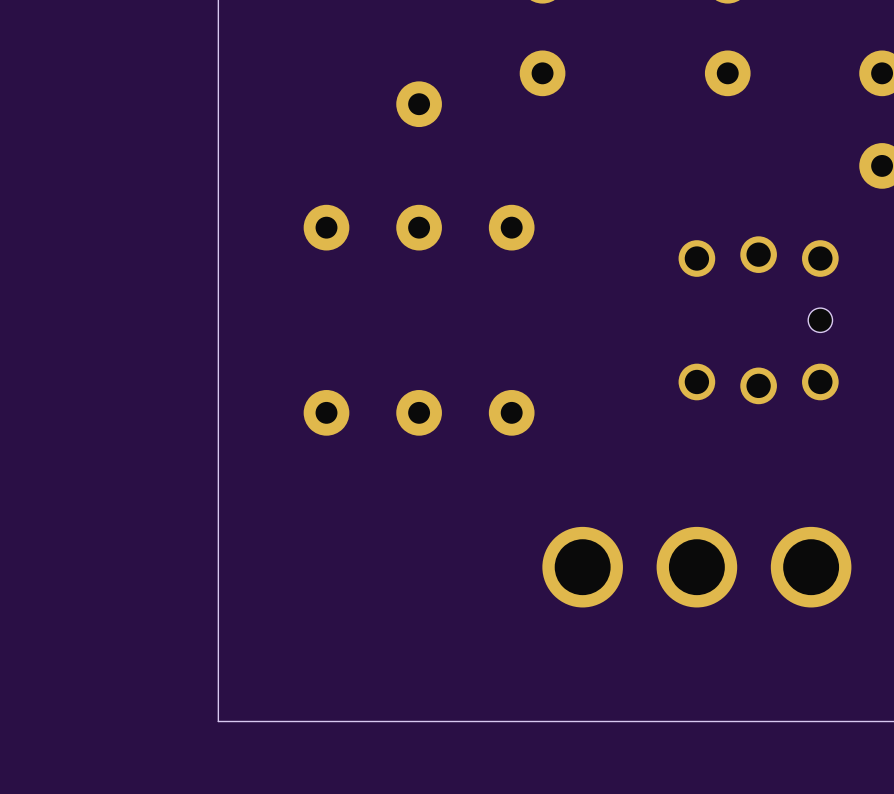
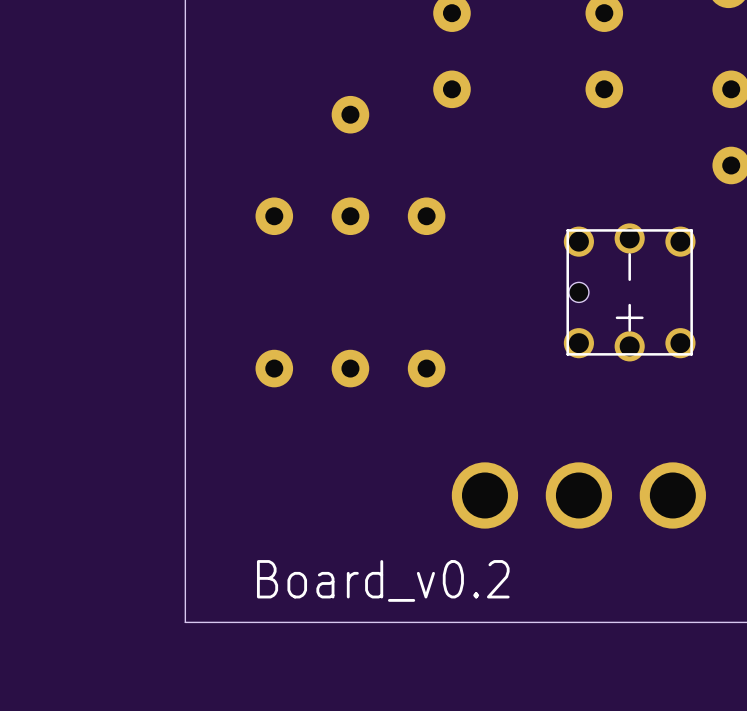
part side: top (758, 320) -> bottom (629, 292)
text: none -> Board_v0.2 (383, 580)

